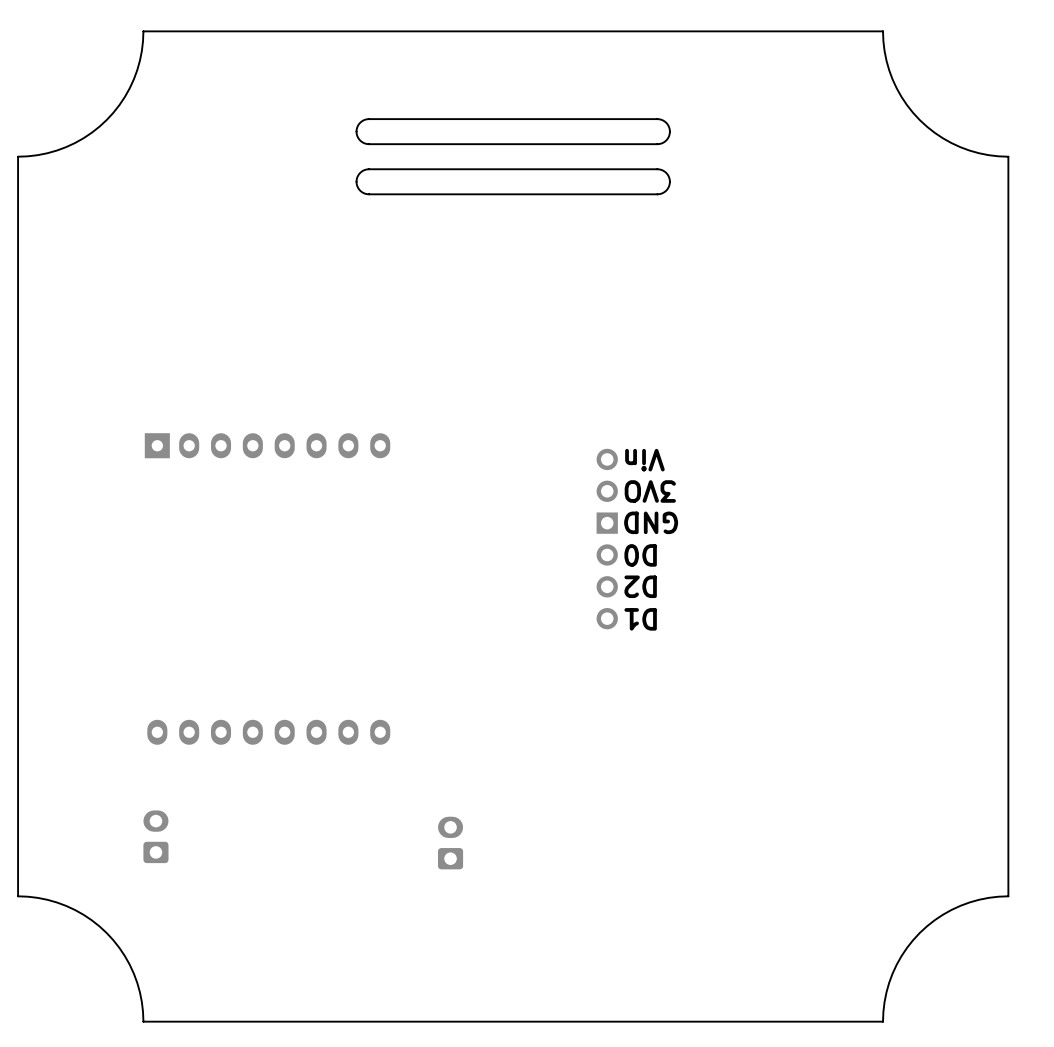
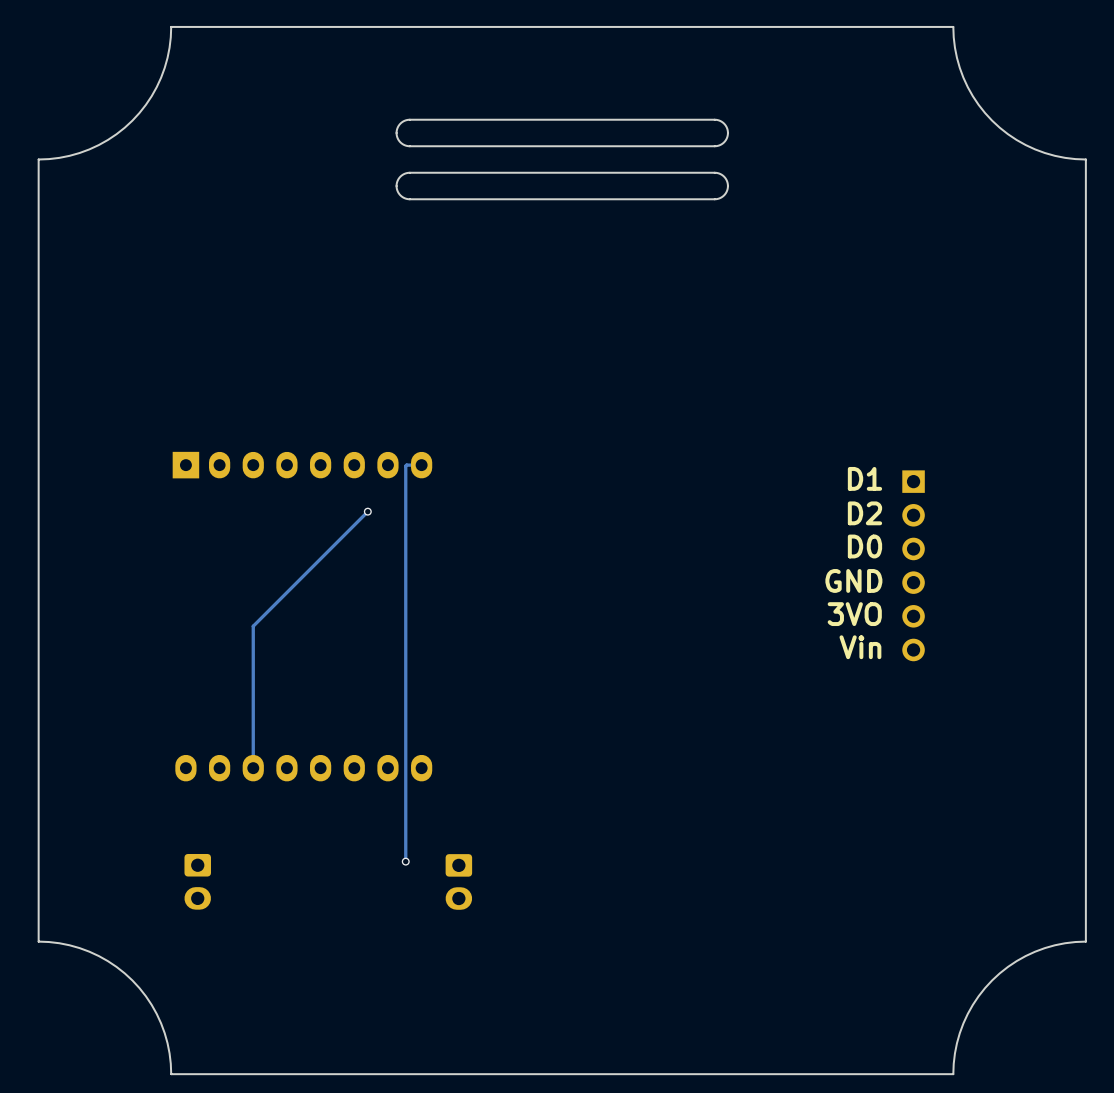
track: none -> (421, 465) (405, 466) (405, 861)
text rotation: 0° (644, 460) -> 180° (860, 647)
text position: Vin (644, 460) -> Vin (860, 647)
track: none -> (367, 511) (253, 626) (253, 768)
via: none -> (367, 511)
text rotation: 0° (650, 491) -> 180° (854, 614)
text position: 3VO (650, 491) -> 3VO (854, 614)
text rotation: 0° (651, 522) -> 180° (853, 580)
text position: GND (651, 522) -> GND (853, 580)
part: (607, 539) -> none
part: none -> (913, 565)
text rotation: 0° (640, 555) -> 180° (864, 546)
text position: D0 (640, 555) -> D0 (864, 546)
text rotation: 0° (640, 586) -> 180° (864, 513)
text position: D2 (640, 586) -> D2 (864, 513)
text rotation: 0° (640, 619) -> 180° (864, 478)
text position: D1 (640, 619) -> D1 (864, 478)
via: none -> (405, 861)
part rotation: 0° (155, 836) -> 180° (197, 881)
part rotation: 0° (450, 843) -> 180° (458, 881)
part position: (450, 843) -> (458, 881)

